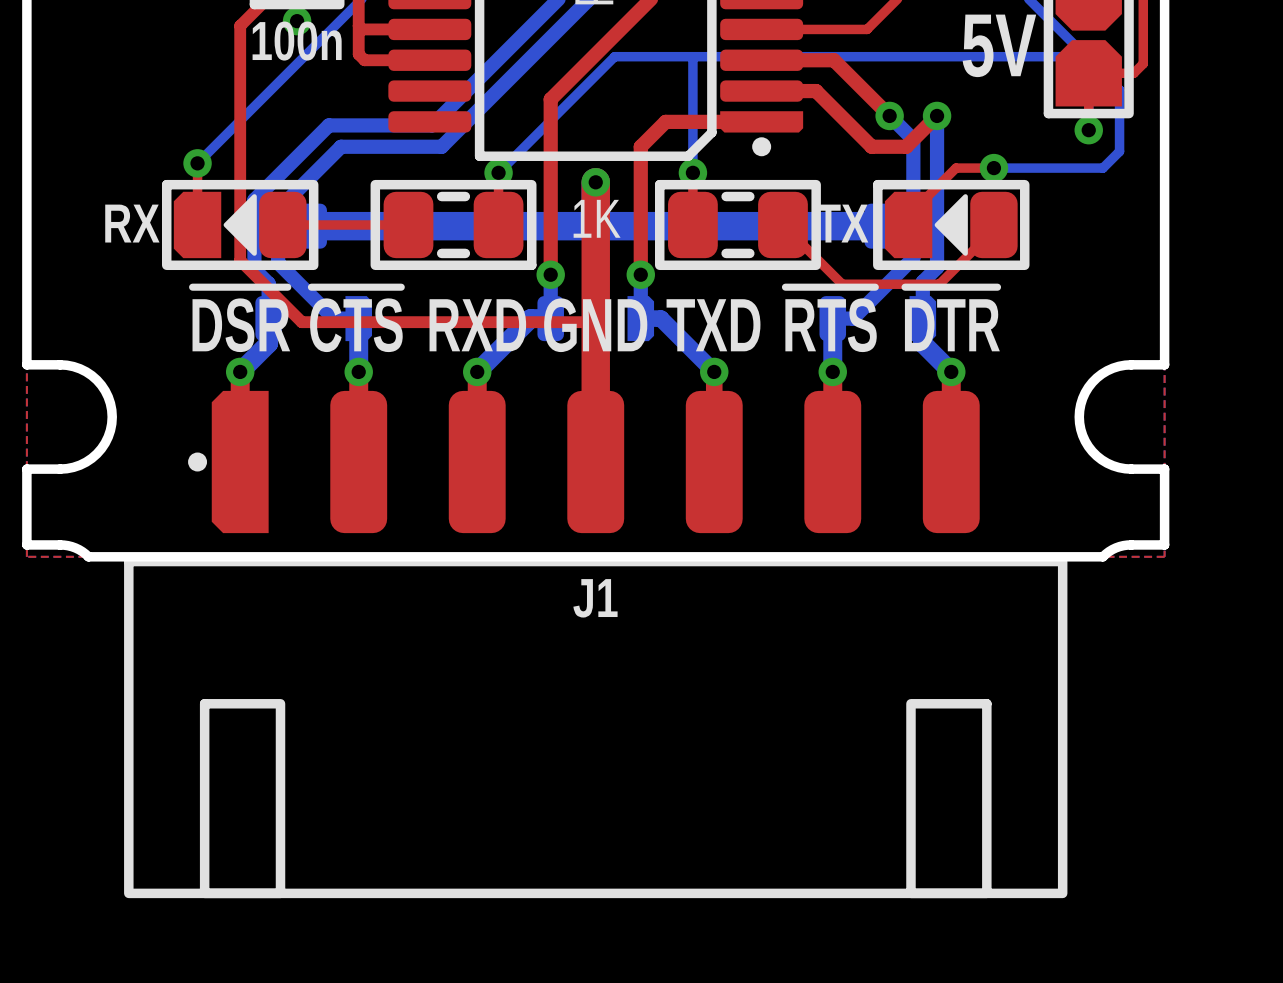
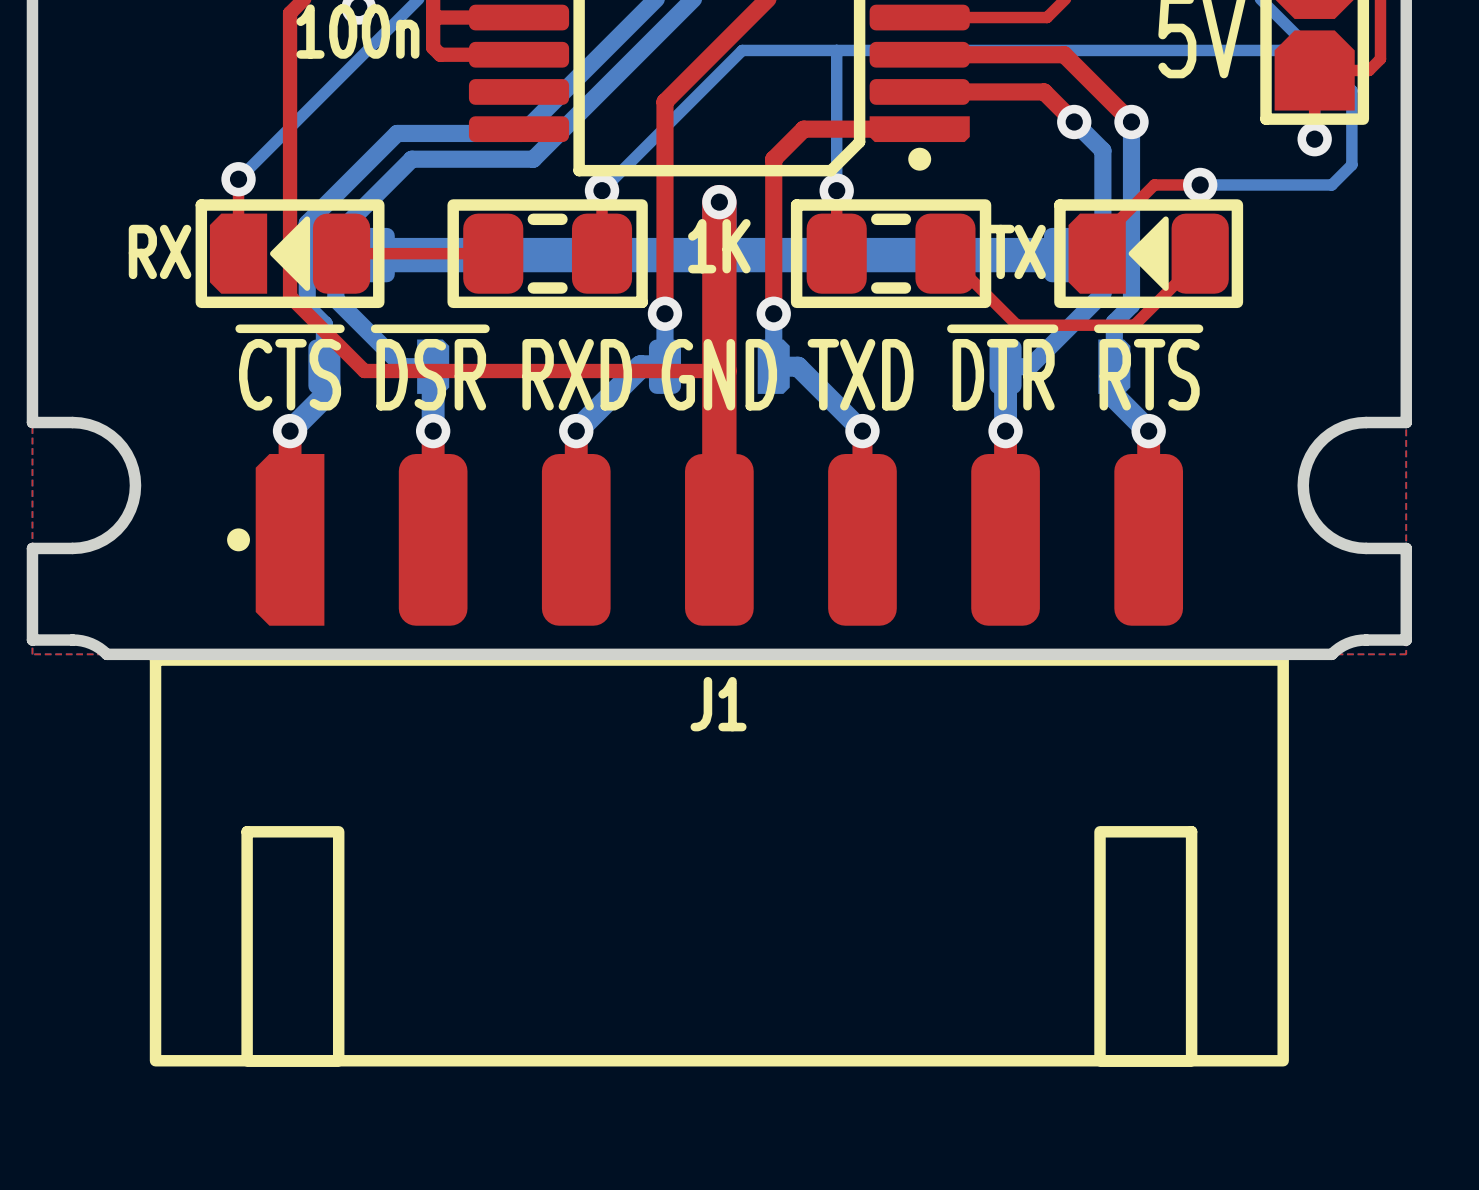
top track: (833, 60) (864, 91) -> (985, 91) (1044, 91)
top track: (816, 91) (871, 146) (906, 146) (937, 115) -> (1007, 54) (1064, 54) (1131, 122)
text: ~{DSR} (241, 319) -> ~{CTS} (290, 367)
text: ~{CTS} (356, 319) -> ~{DSR} (430, 367)
text: ~{RTS} (831, 319) -> ~{DTR} (1002, 367)
text: ~{DTR} (952, 319) -> ~{RTS} (1148, 367)

